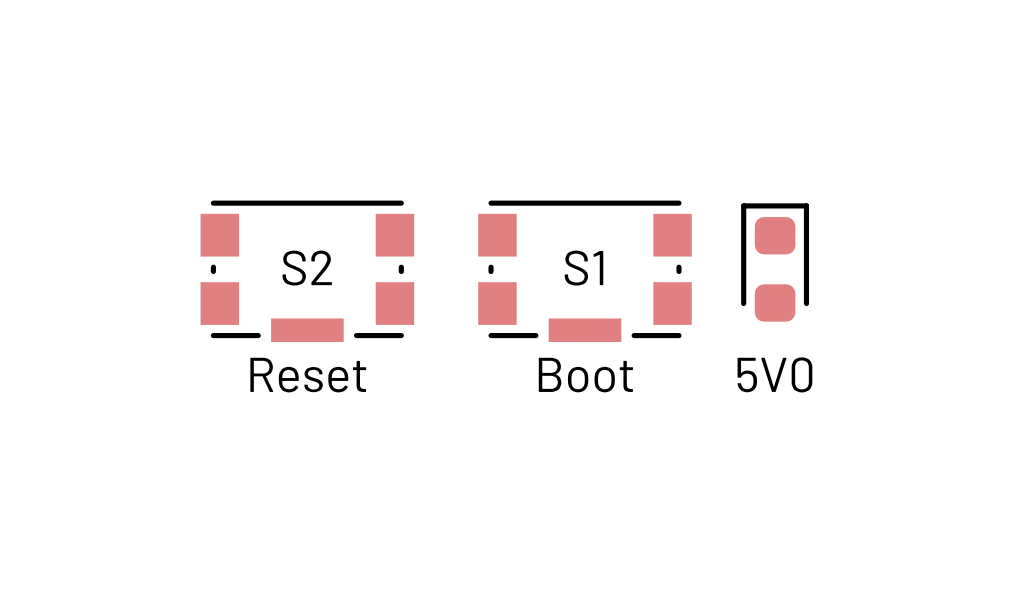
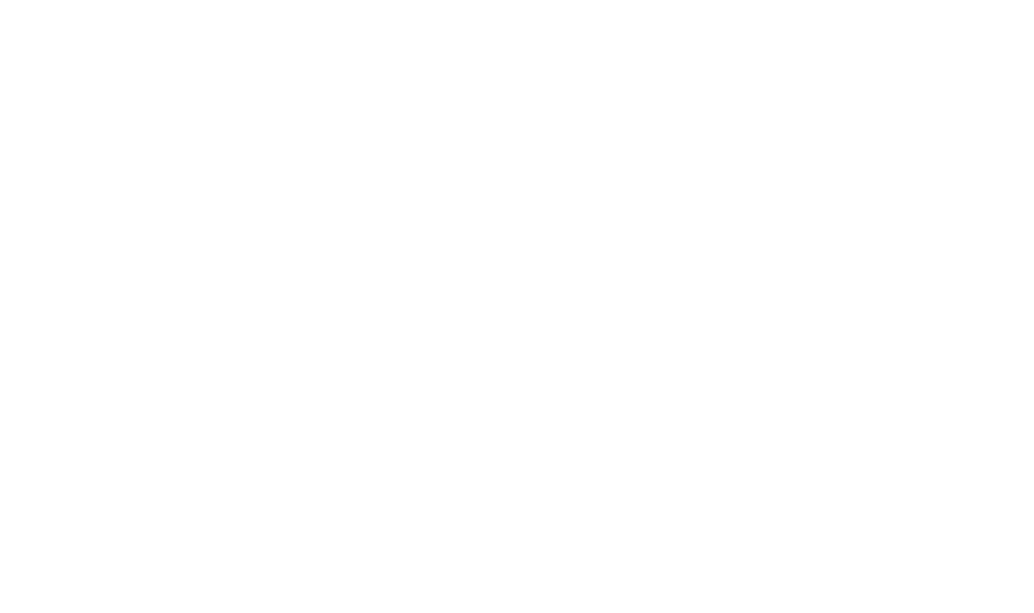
part: 5V0 (775, 262) -> none
S2: Reset (307, 271) -> none
S1: Boot (585, 271) -> none

